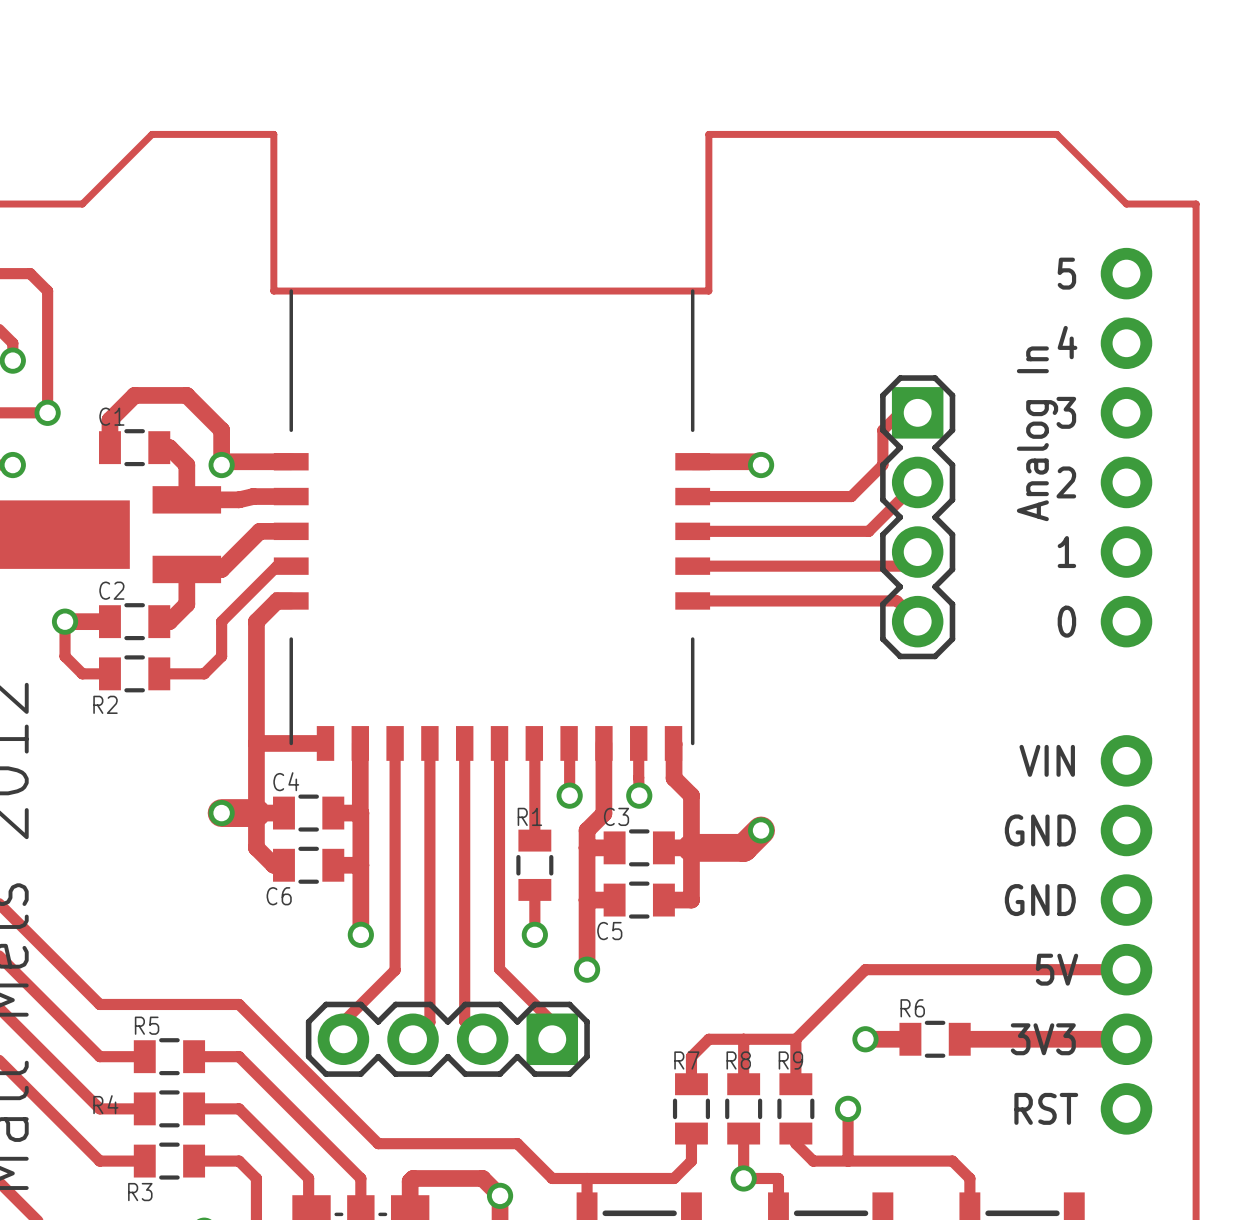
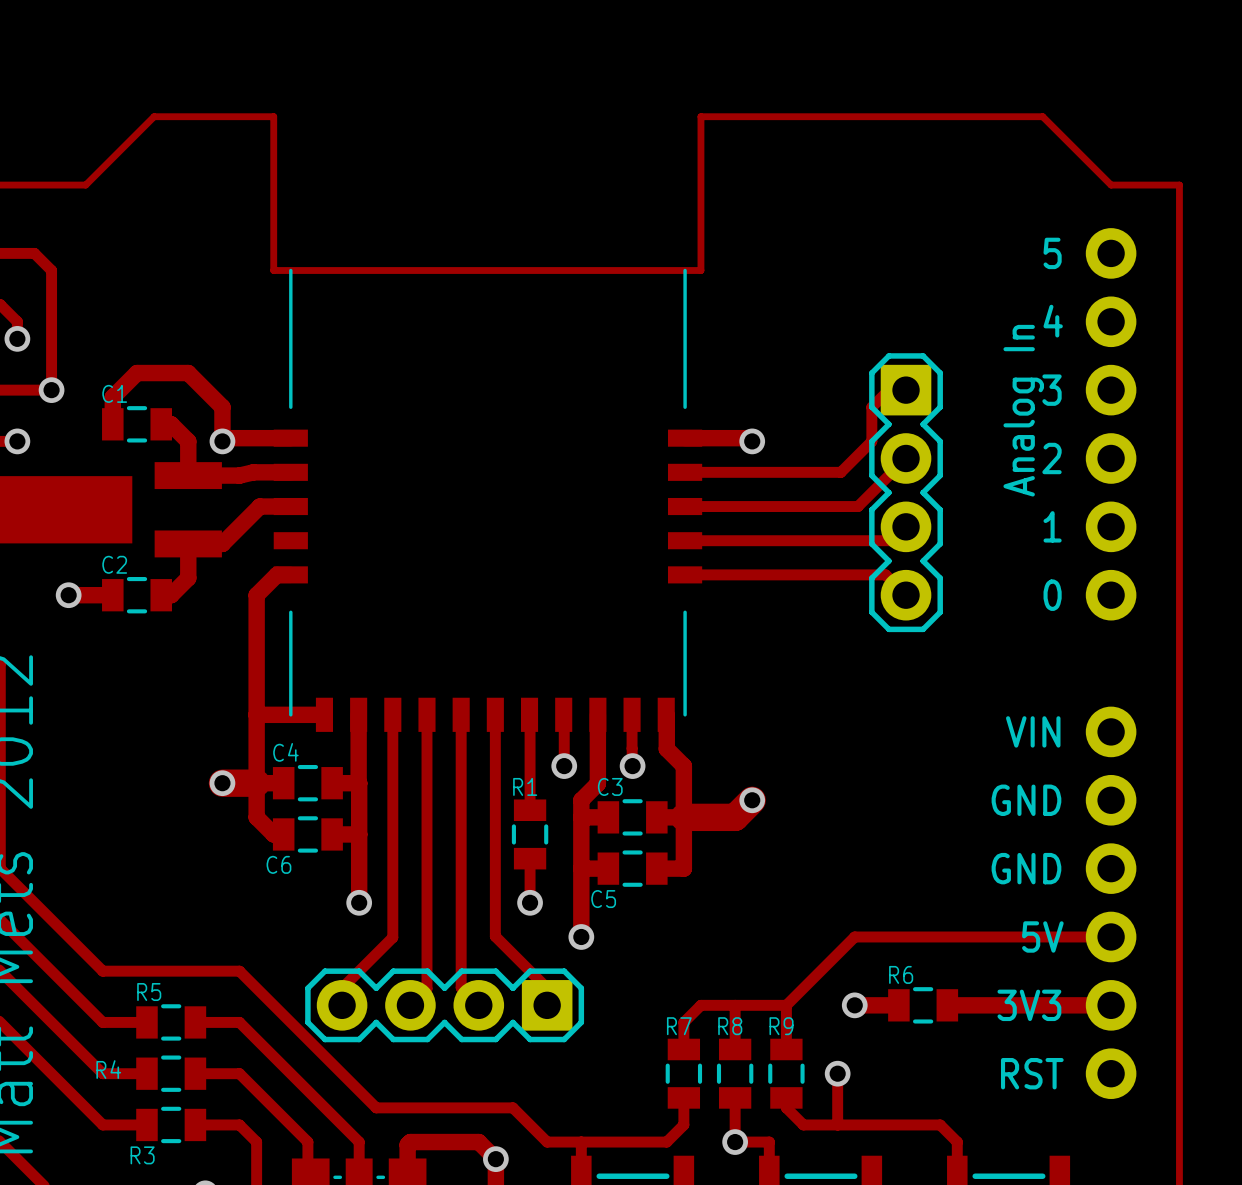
track: (291, 566) (277, 566) (221, 621) (221, 656) (204, 673) (159, 673) -> none
track: (65, 621) (65, 656) (82, 673) (109, 673) -> none
R2: (134, 673) -> none

